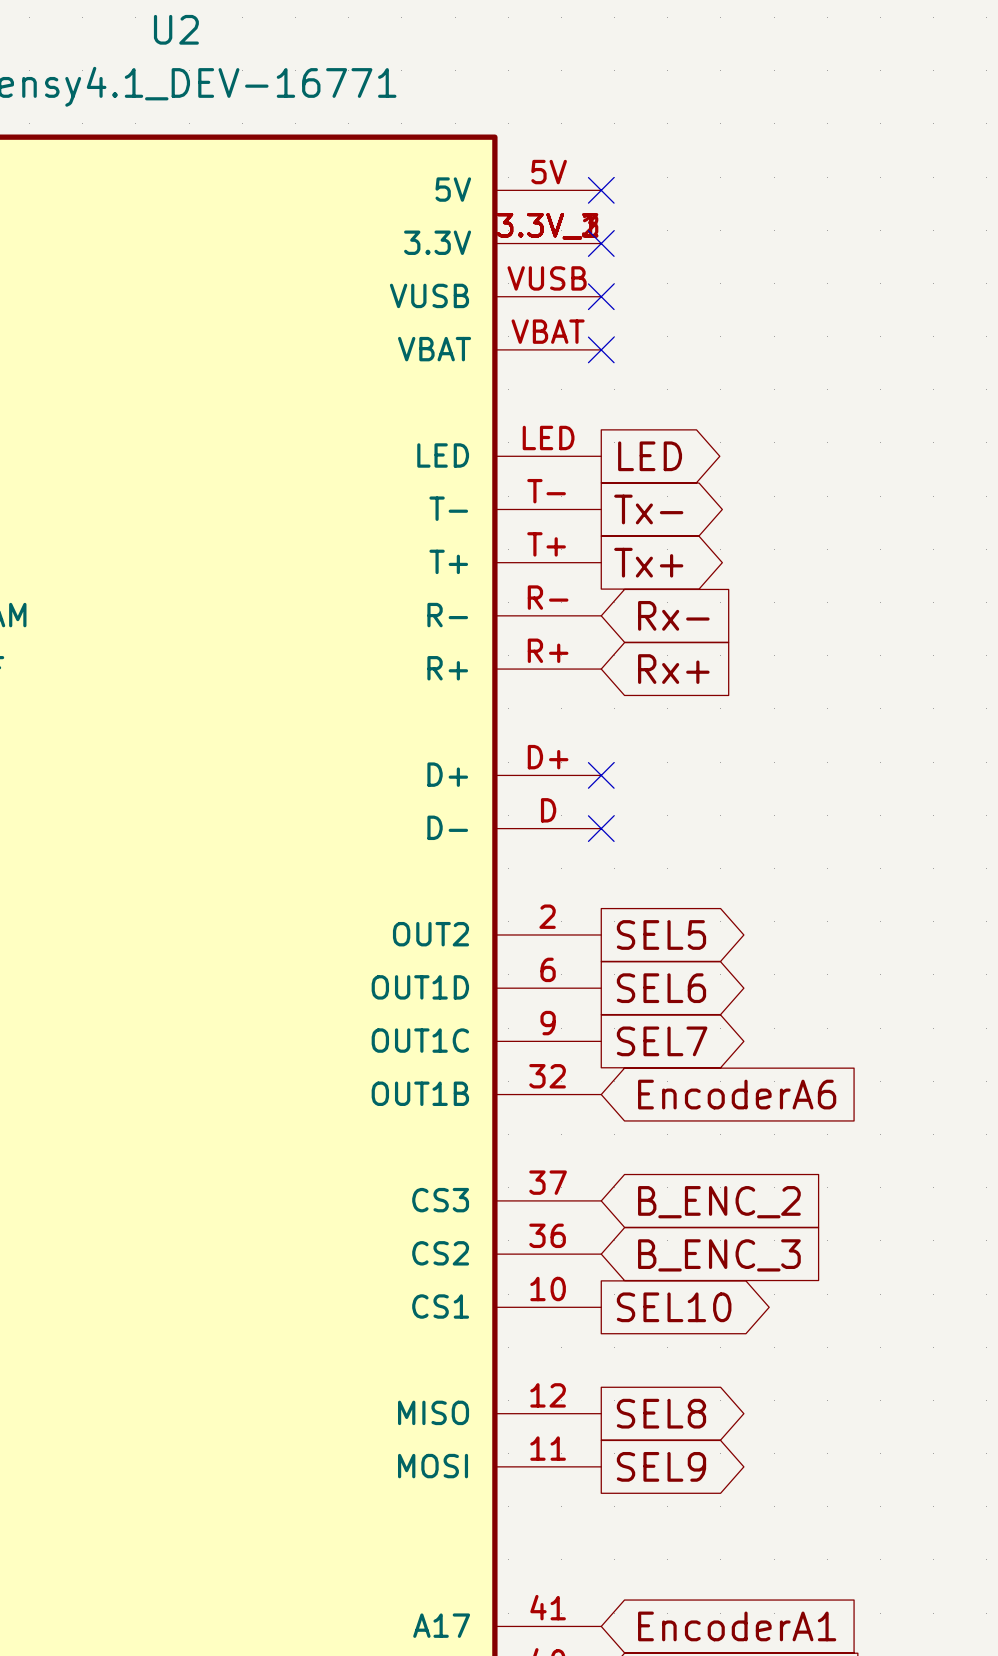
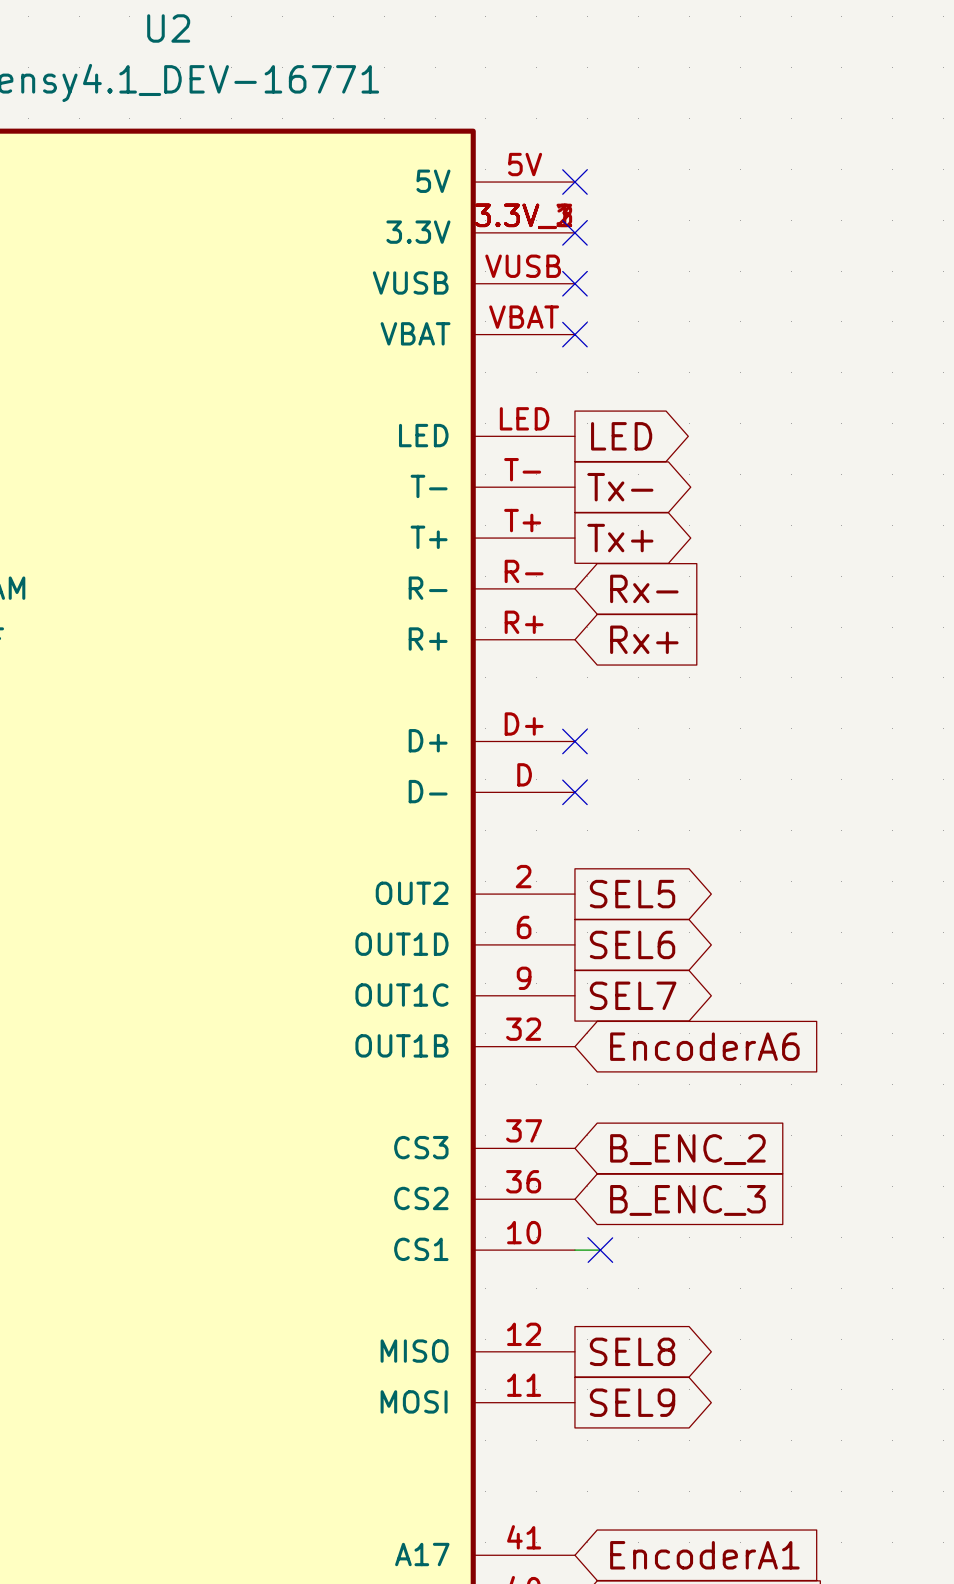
wire: none -> (574, 1250) (600, 1250)
no-connect mark: none -> (600, 1250)
global label: SEL10 (674, 1307) -> none

